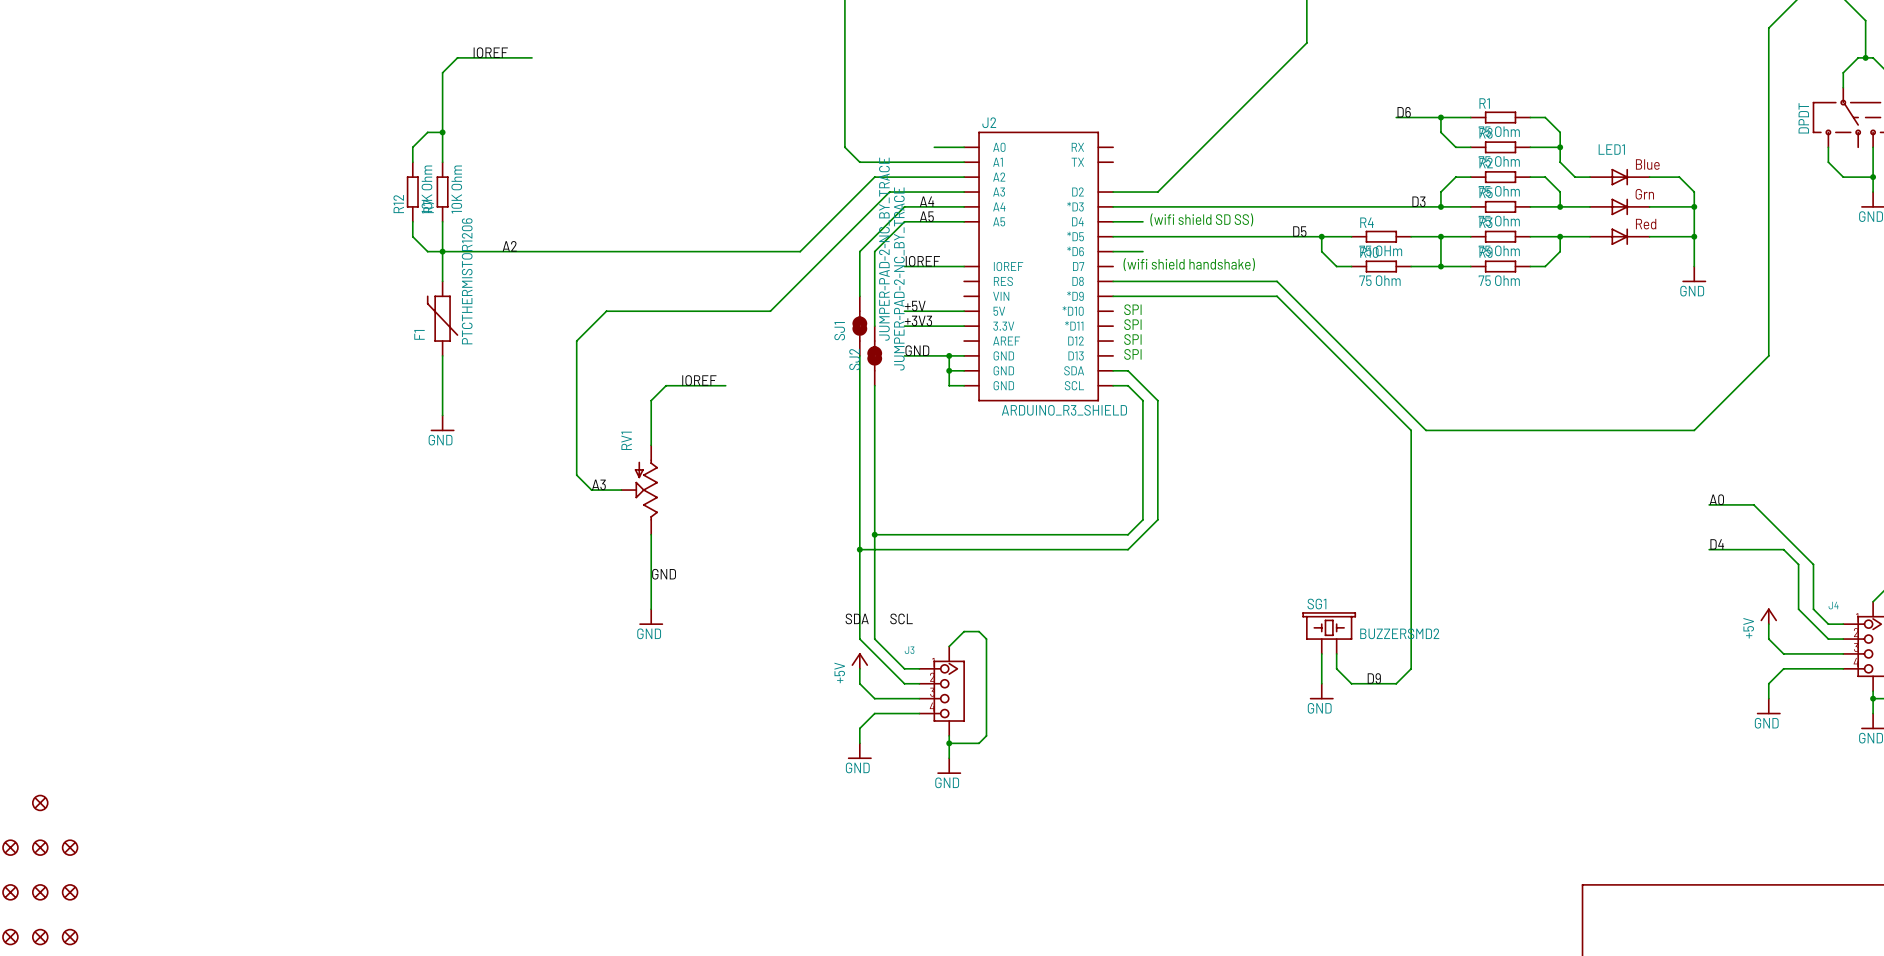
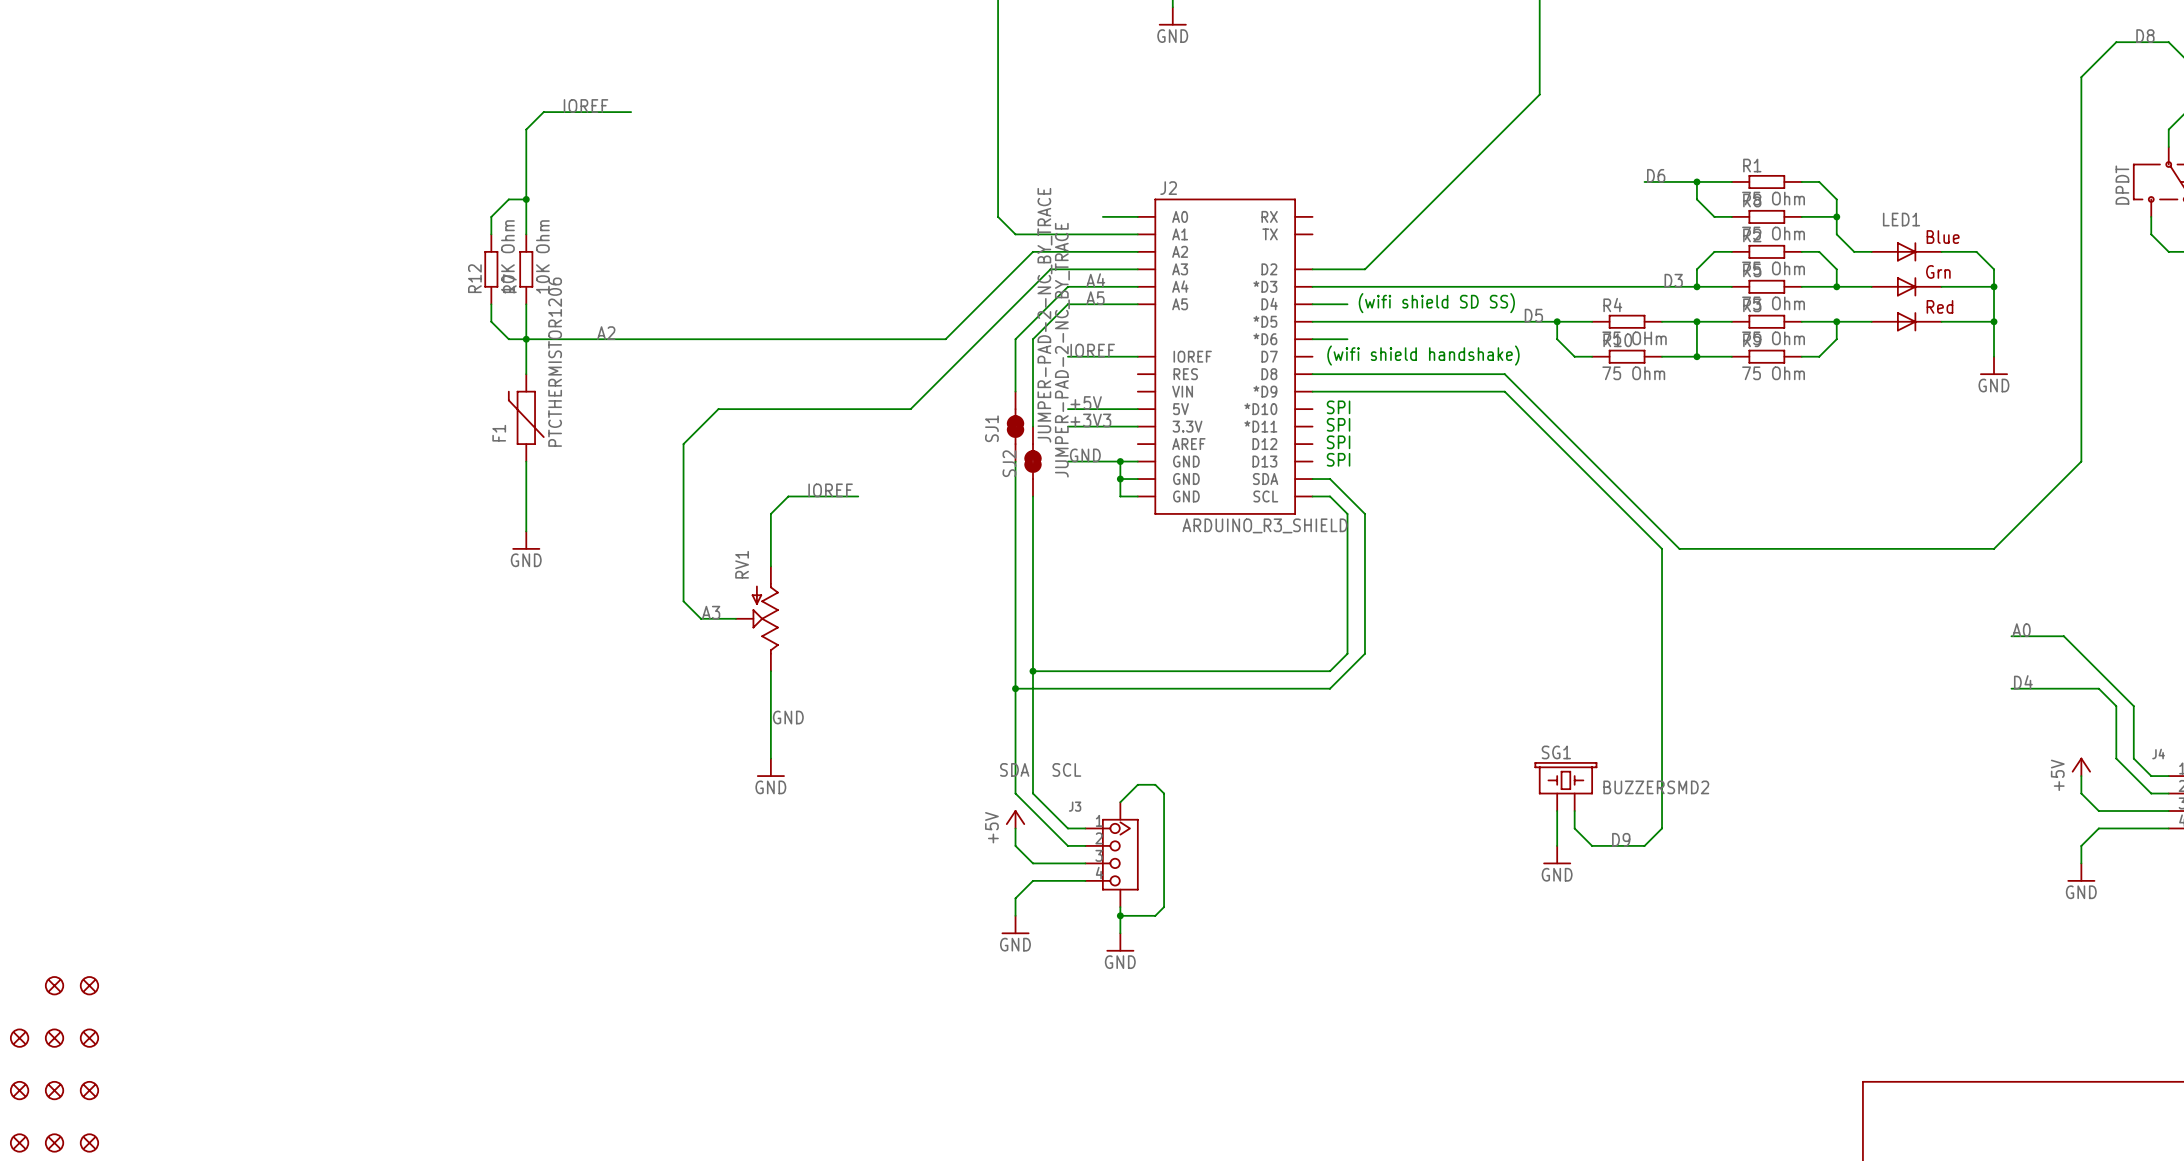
part: none -> (89, 985)

